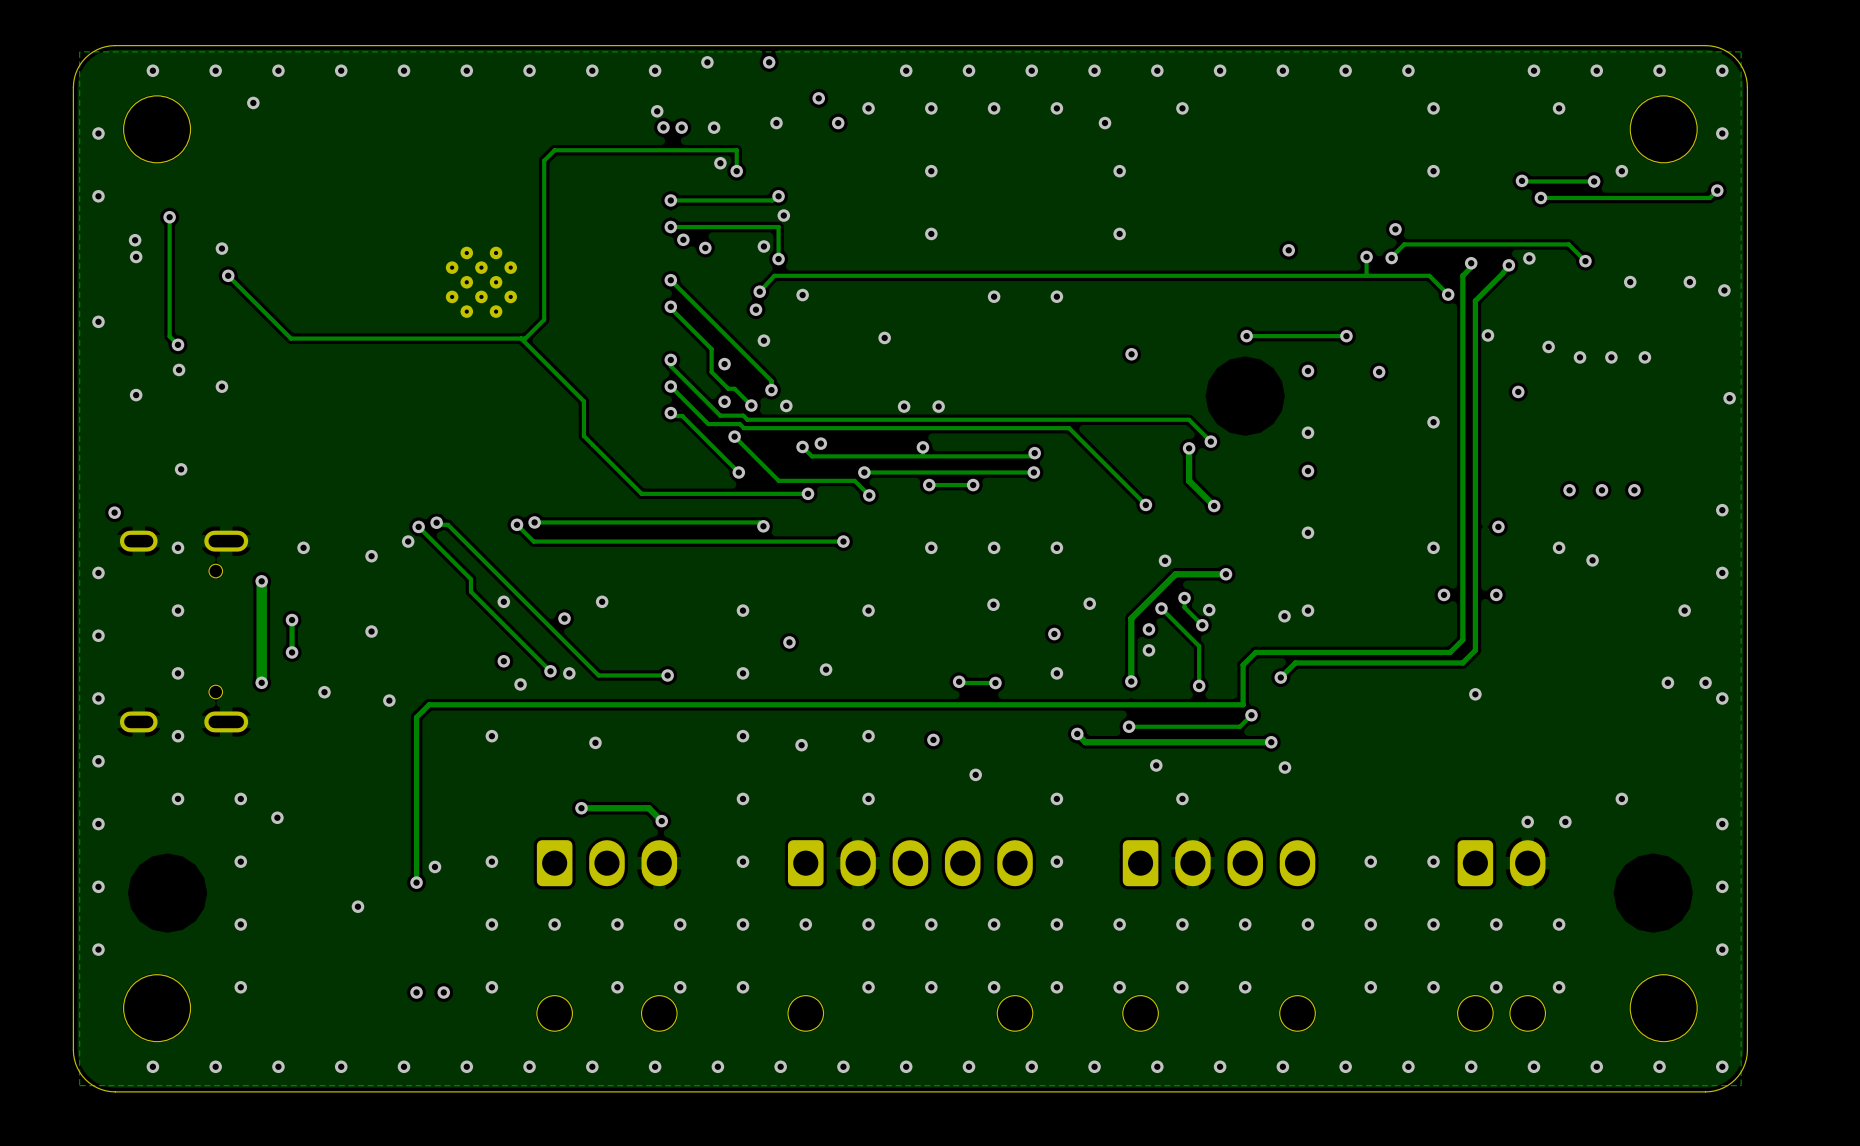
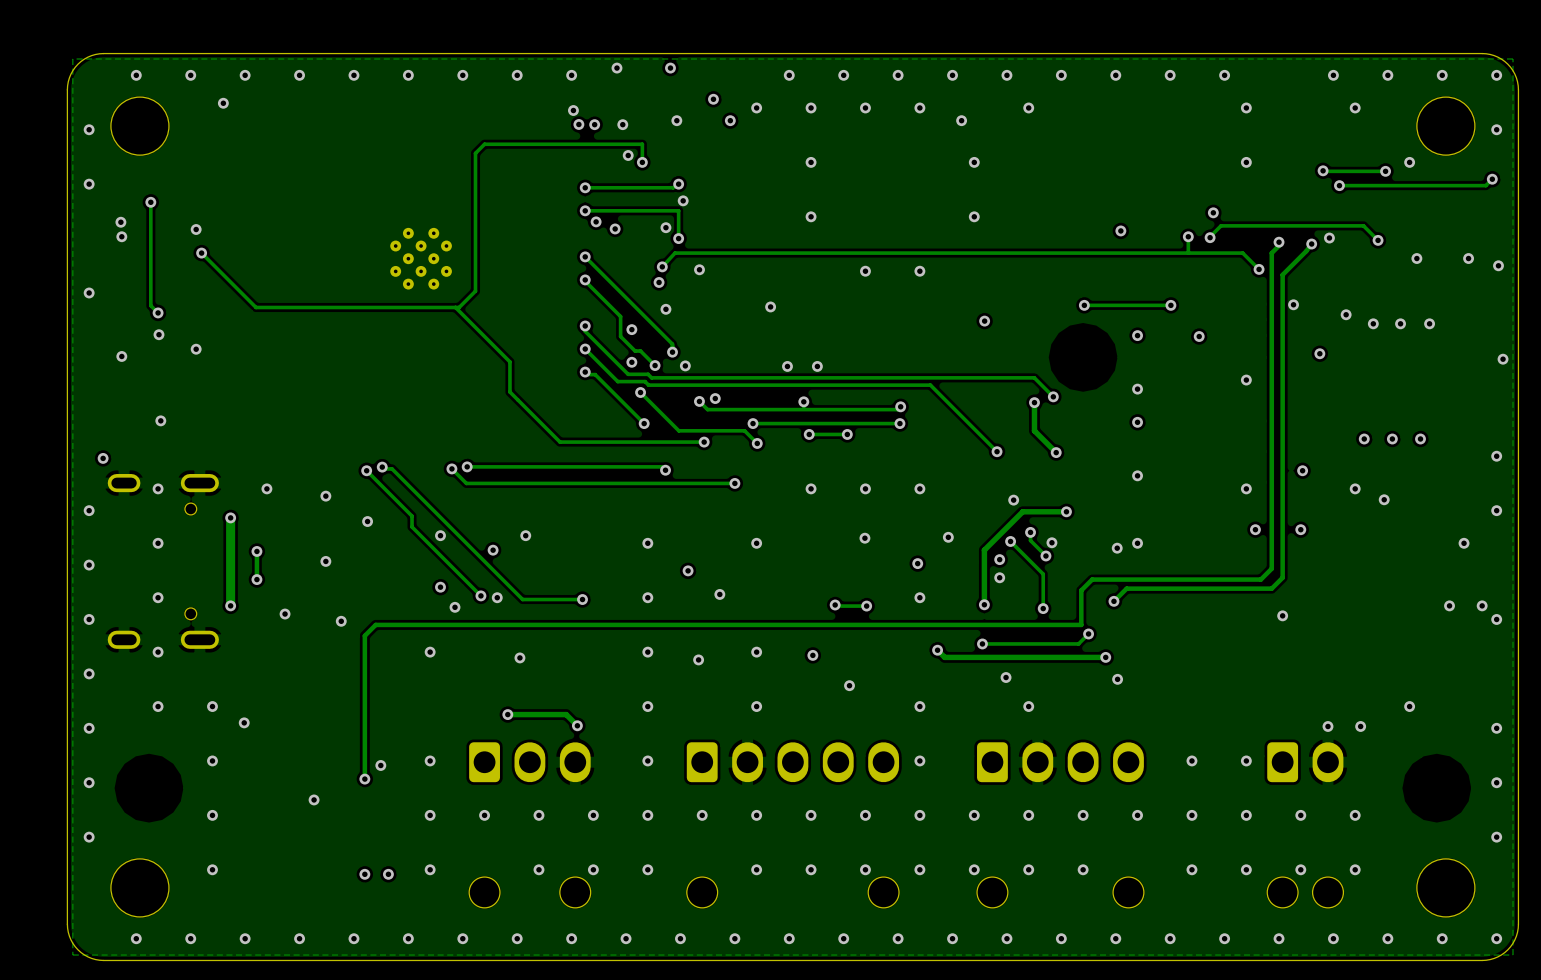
via position: (408, 541) -> (367, 521)

